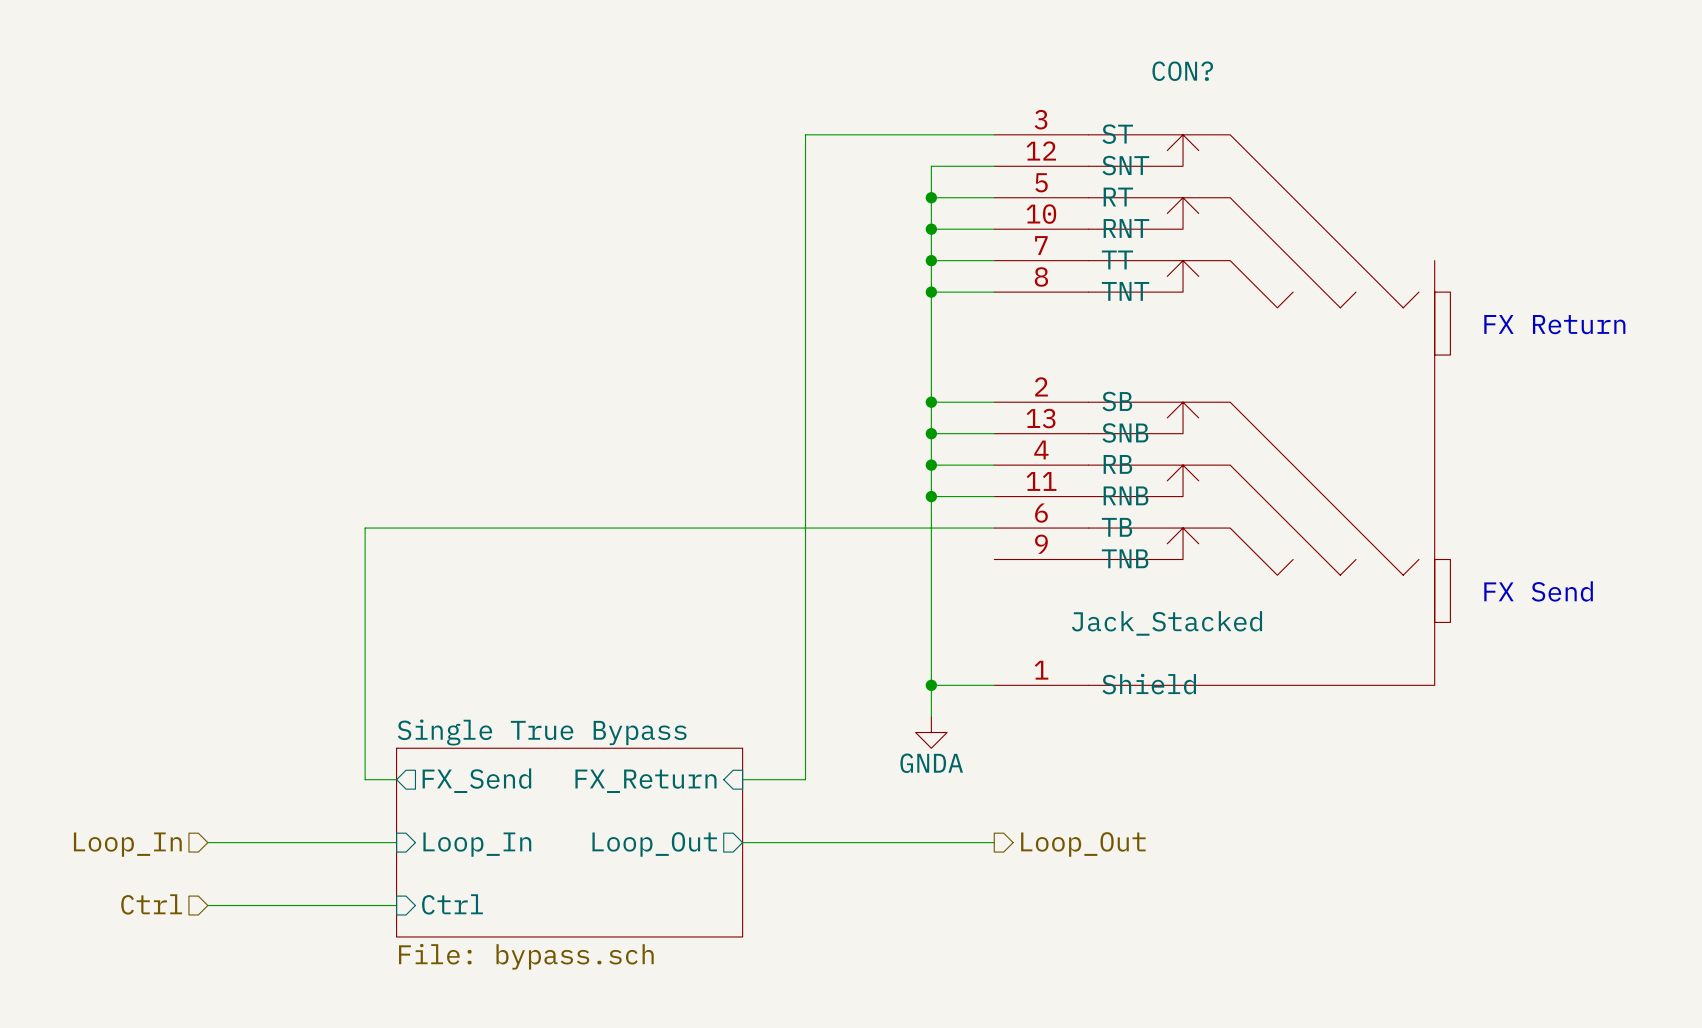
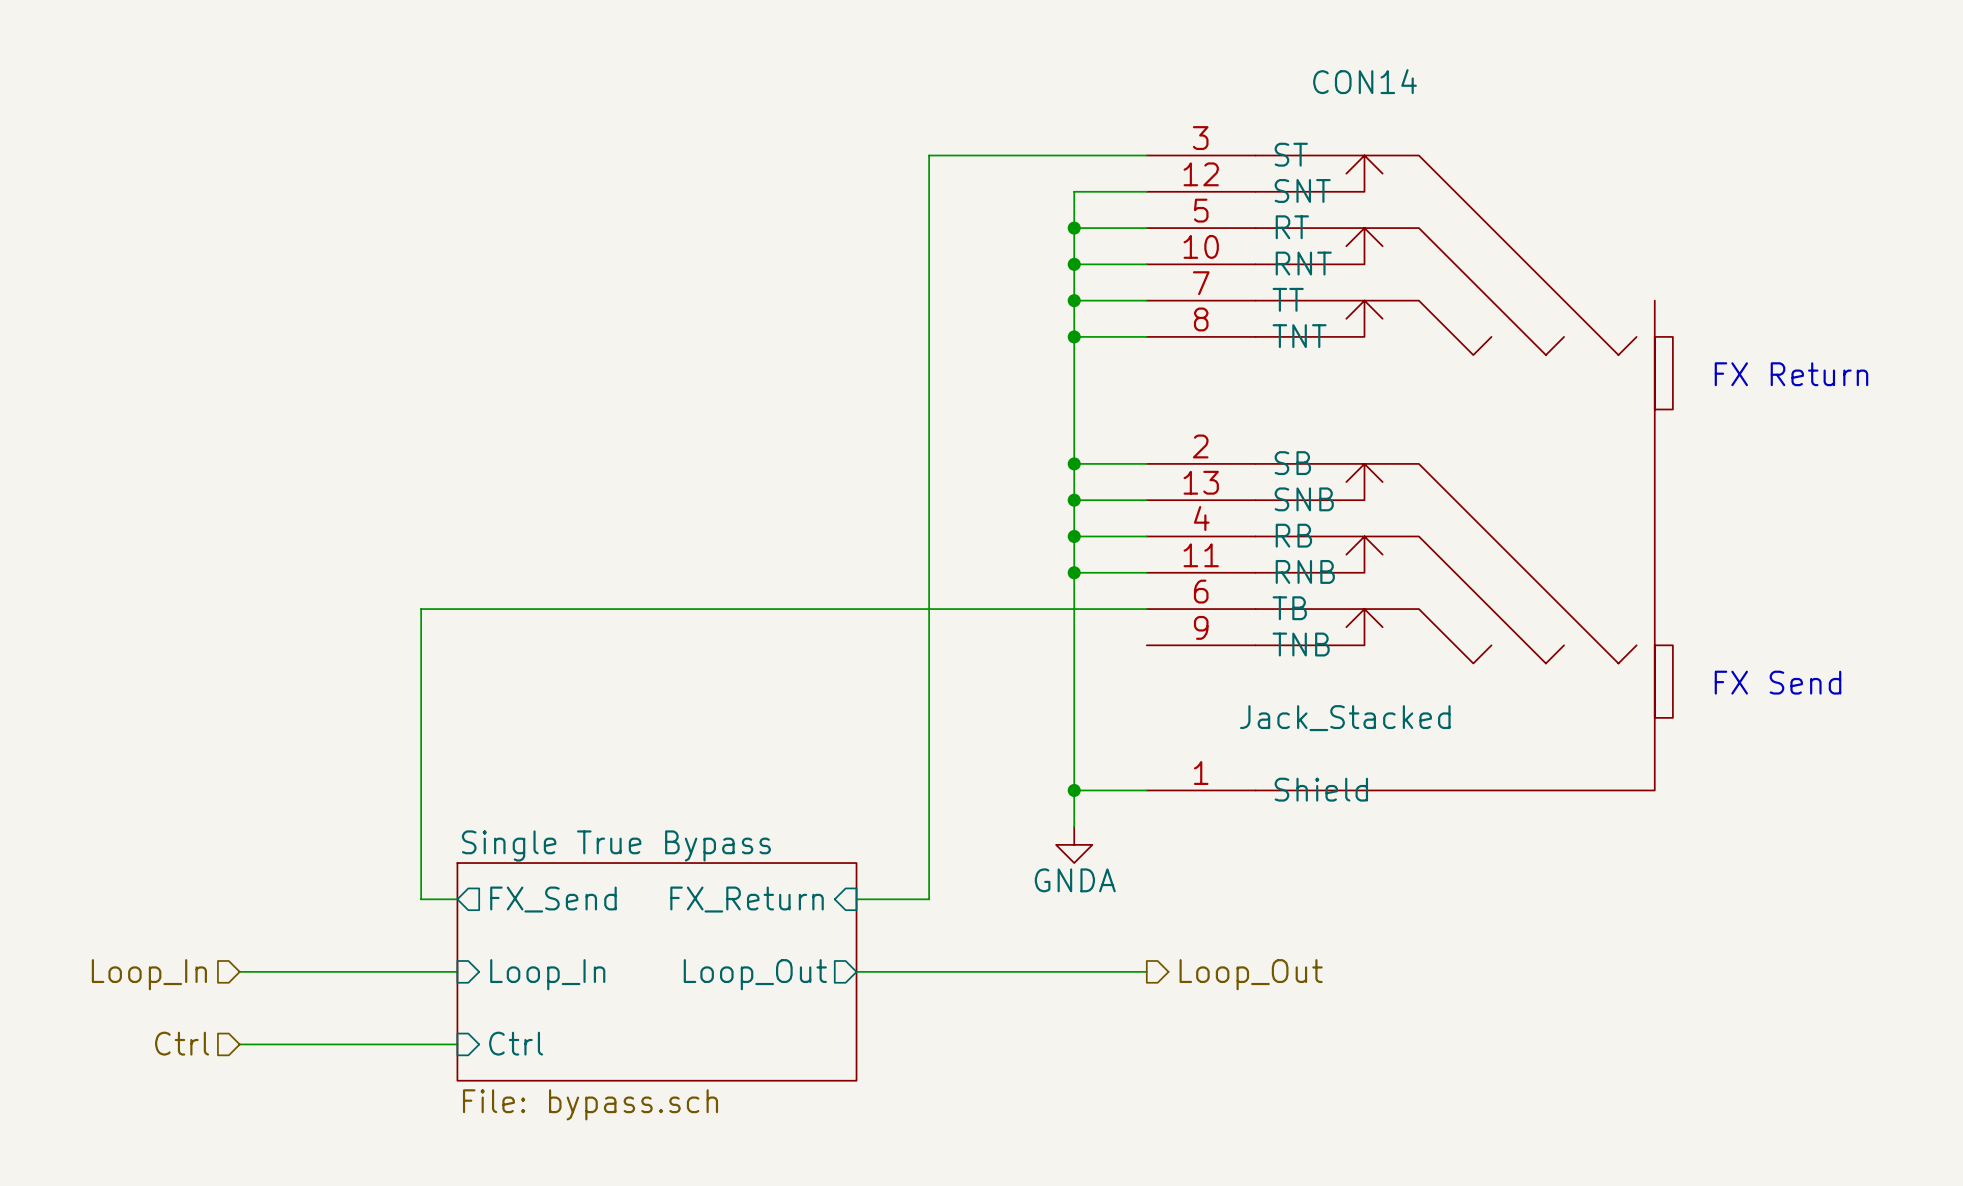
CON? name: CON? (1182, 71) -> CON14 (1365, 81)

